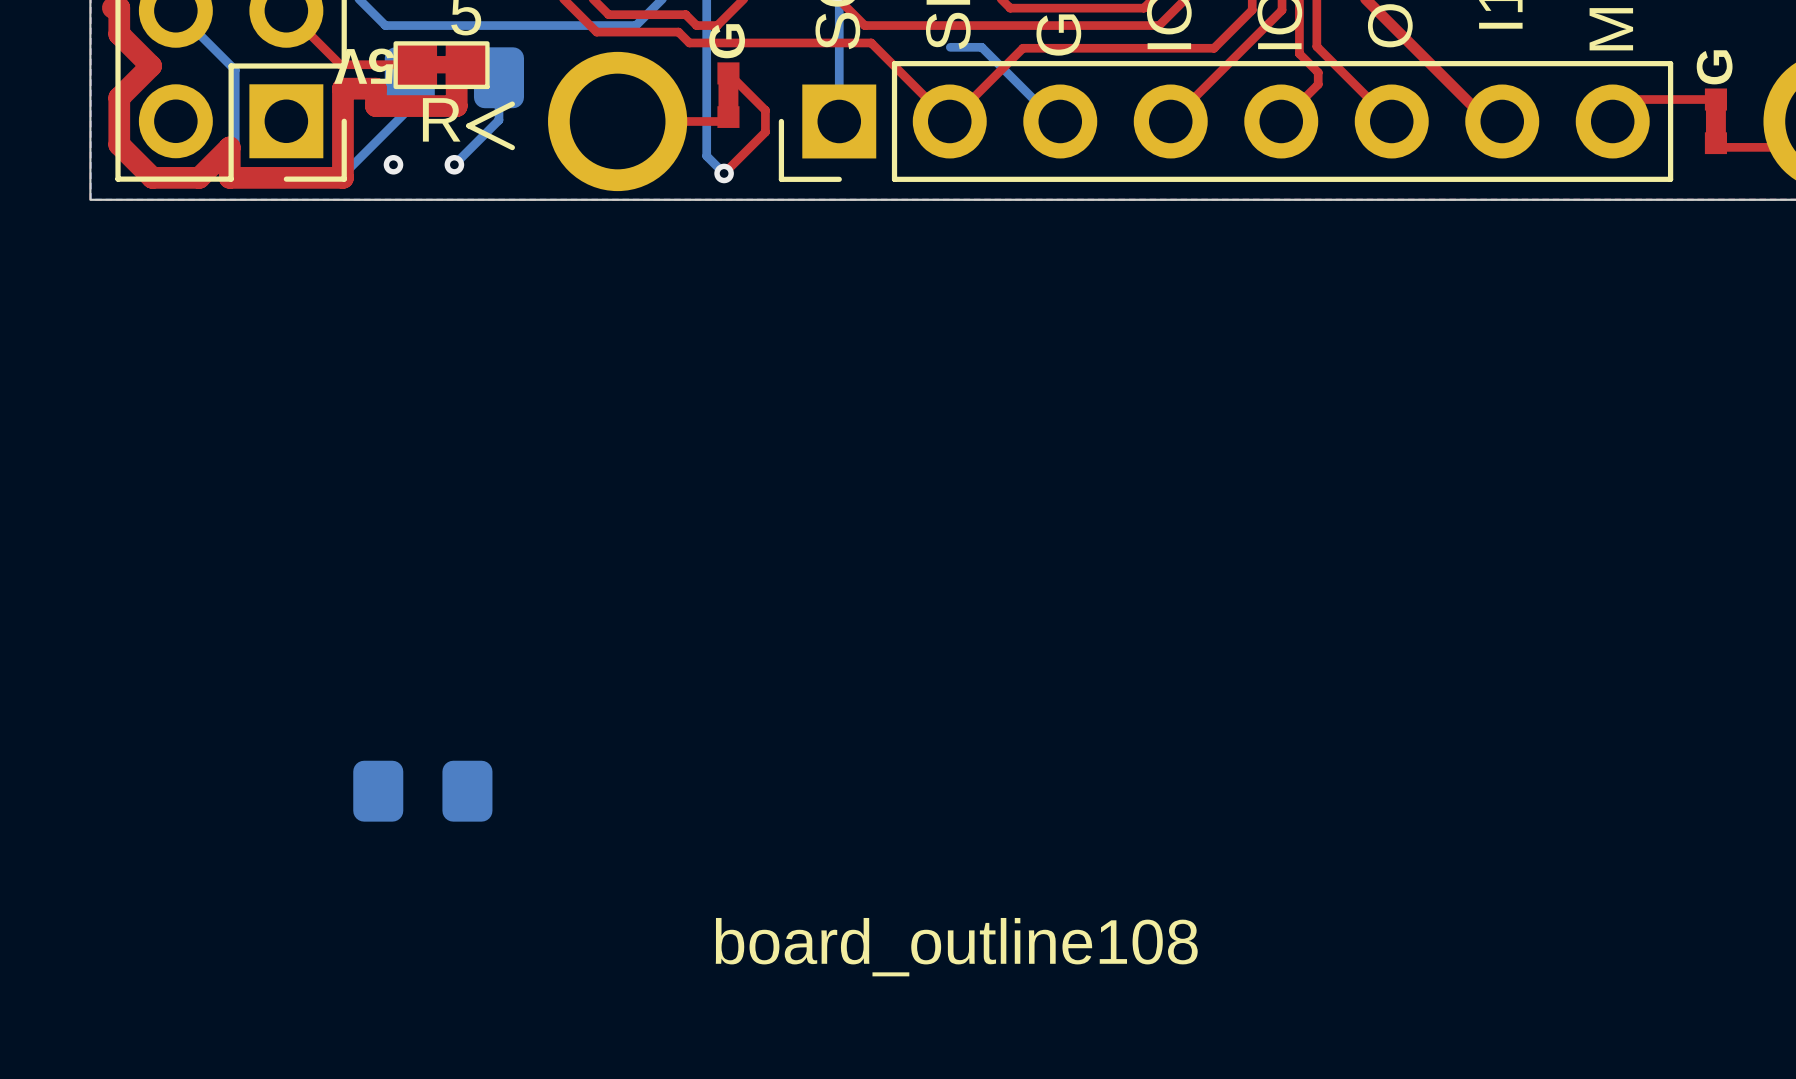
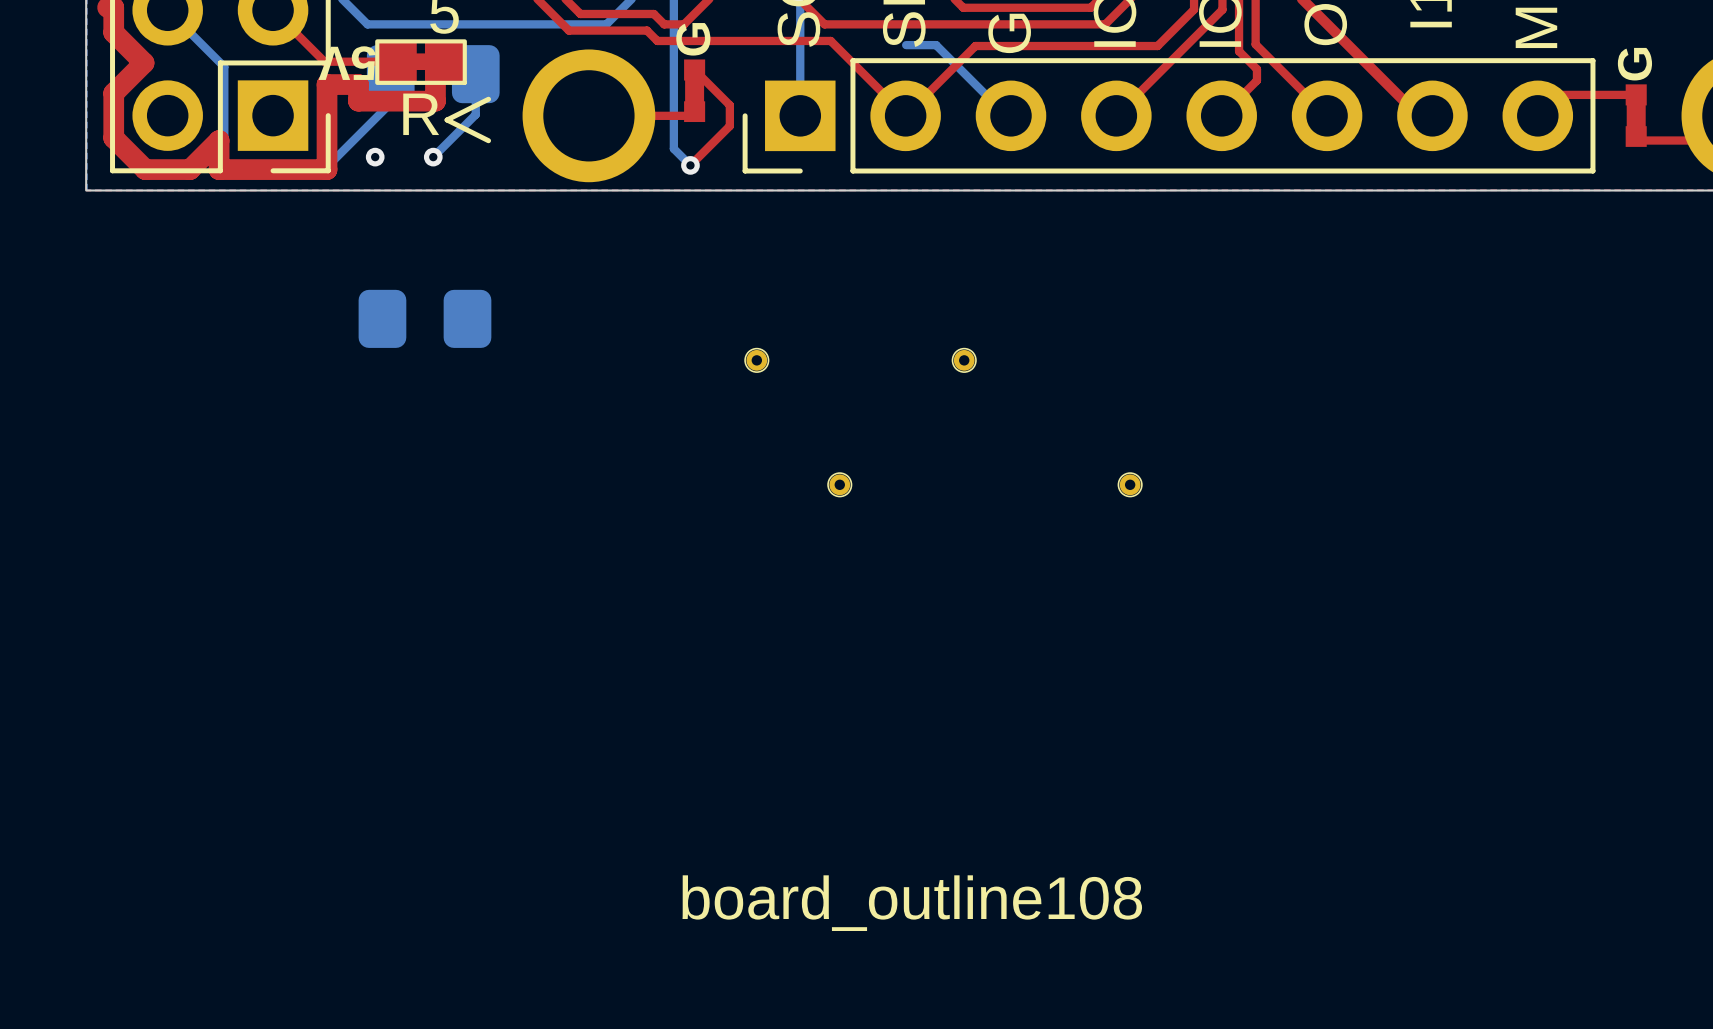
part: none -> (756, 360)
part: none -> (964, 360)
part: none -> (839, 484)
part: none -> (1130, 484)
part position: (422, 791) -> (424, 318)

